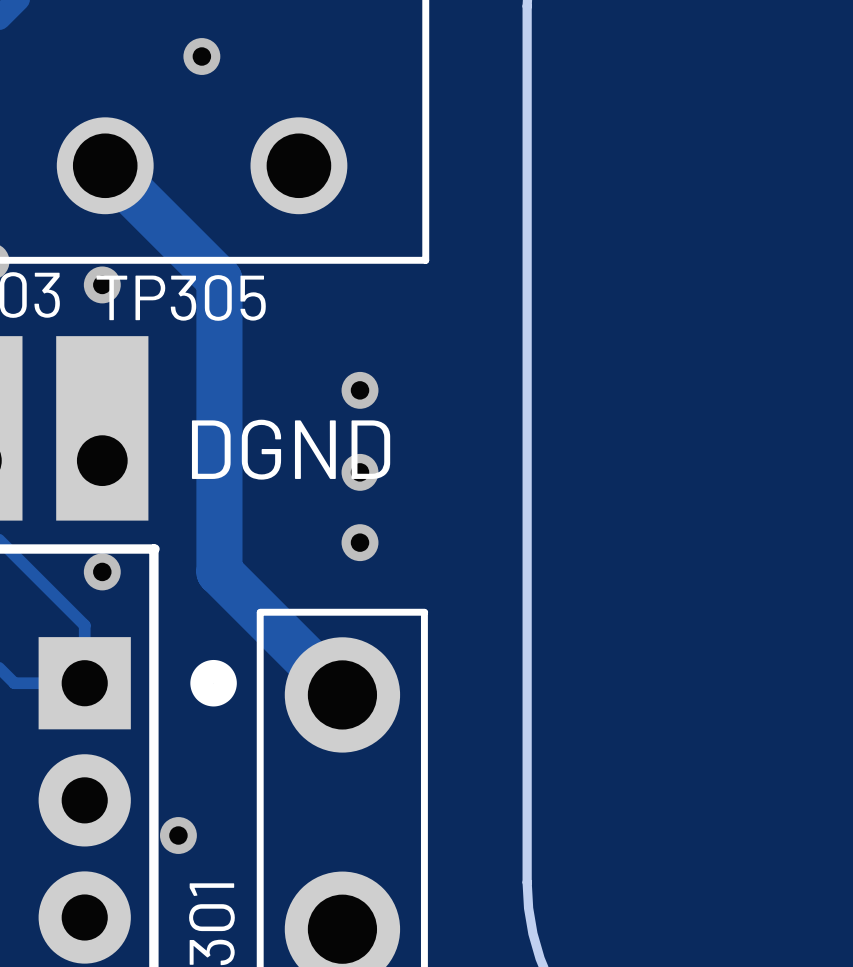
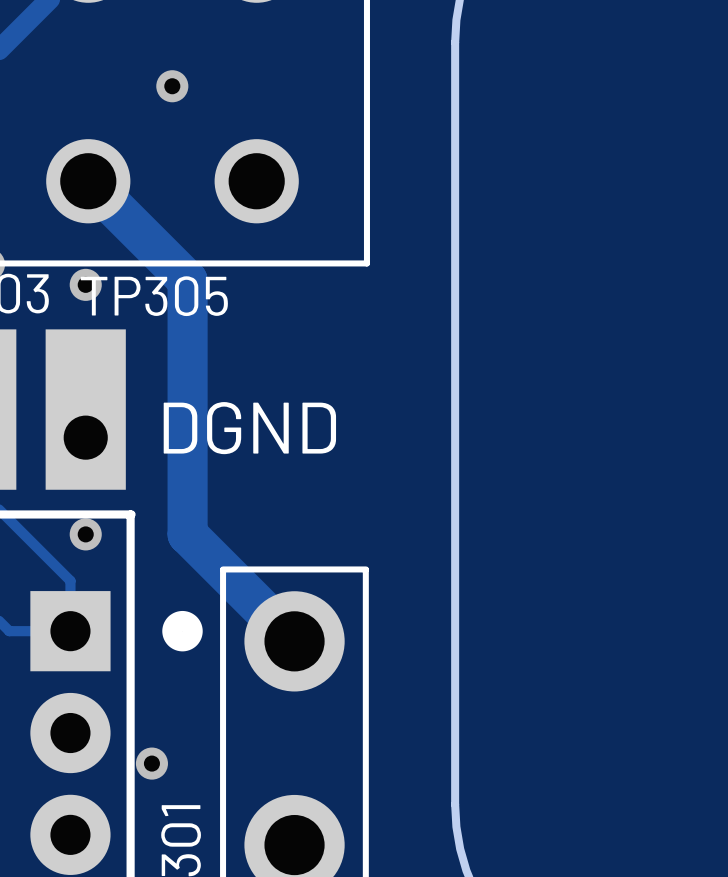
via: (360, 390) -> none
via: (360, 472) -> none
via: (360, 542) -> none

